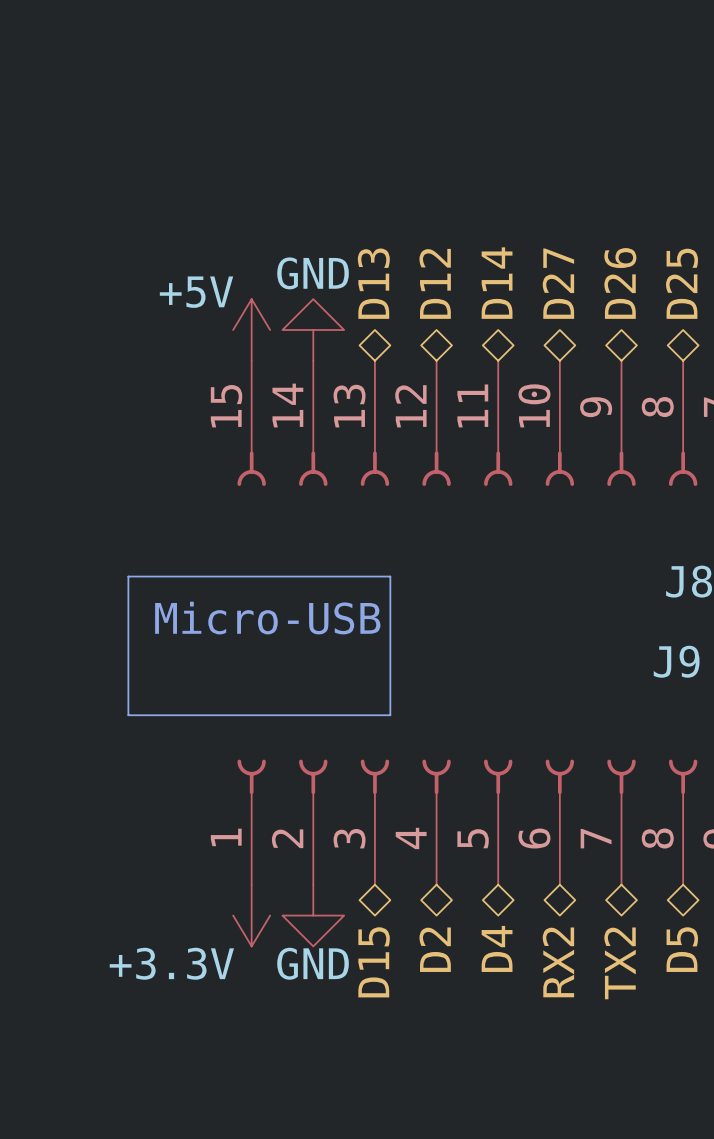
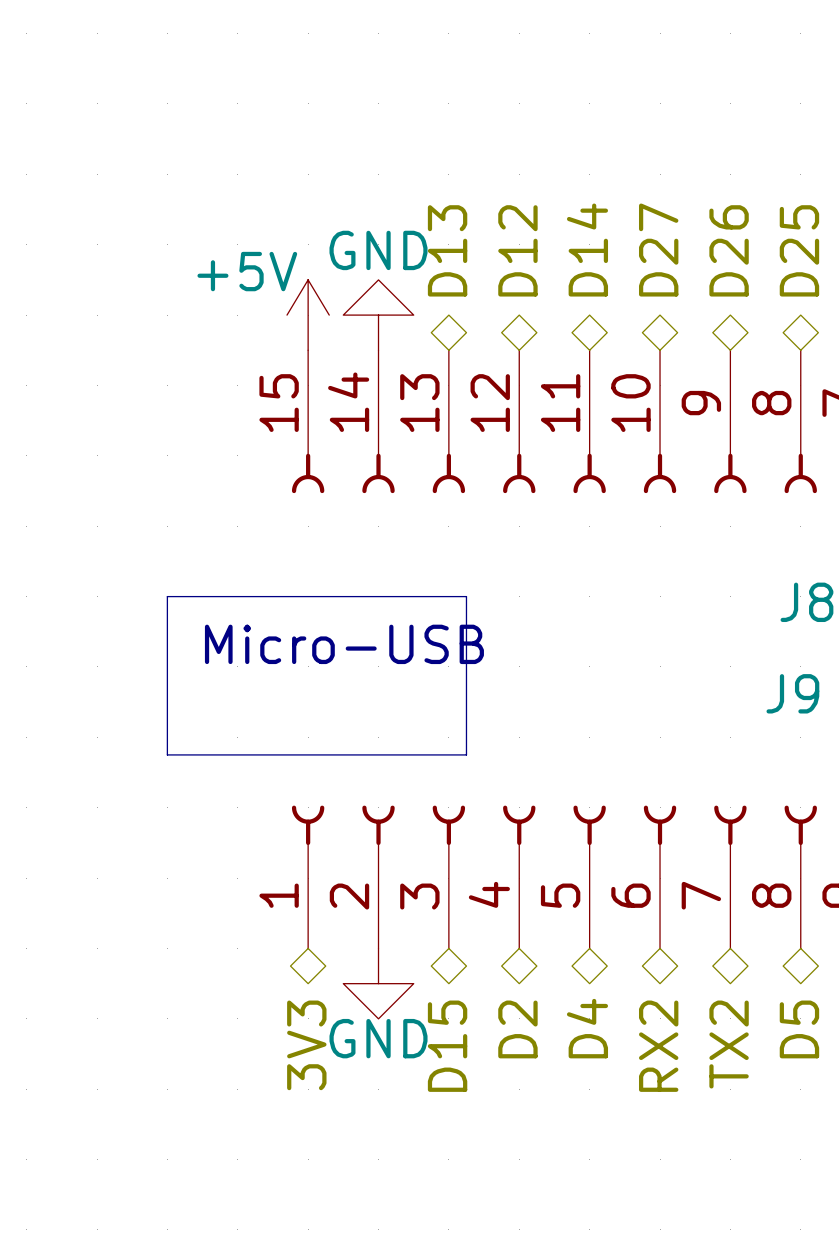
power symbol: +3.3V (251, 915) -> none
hierarchical label: none -> 3V3 (306, 1045)

